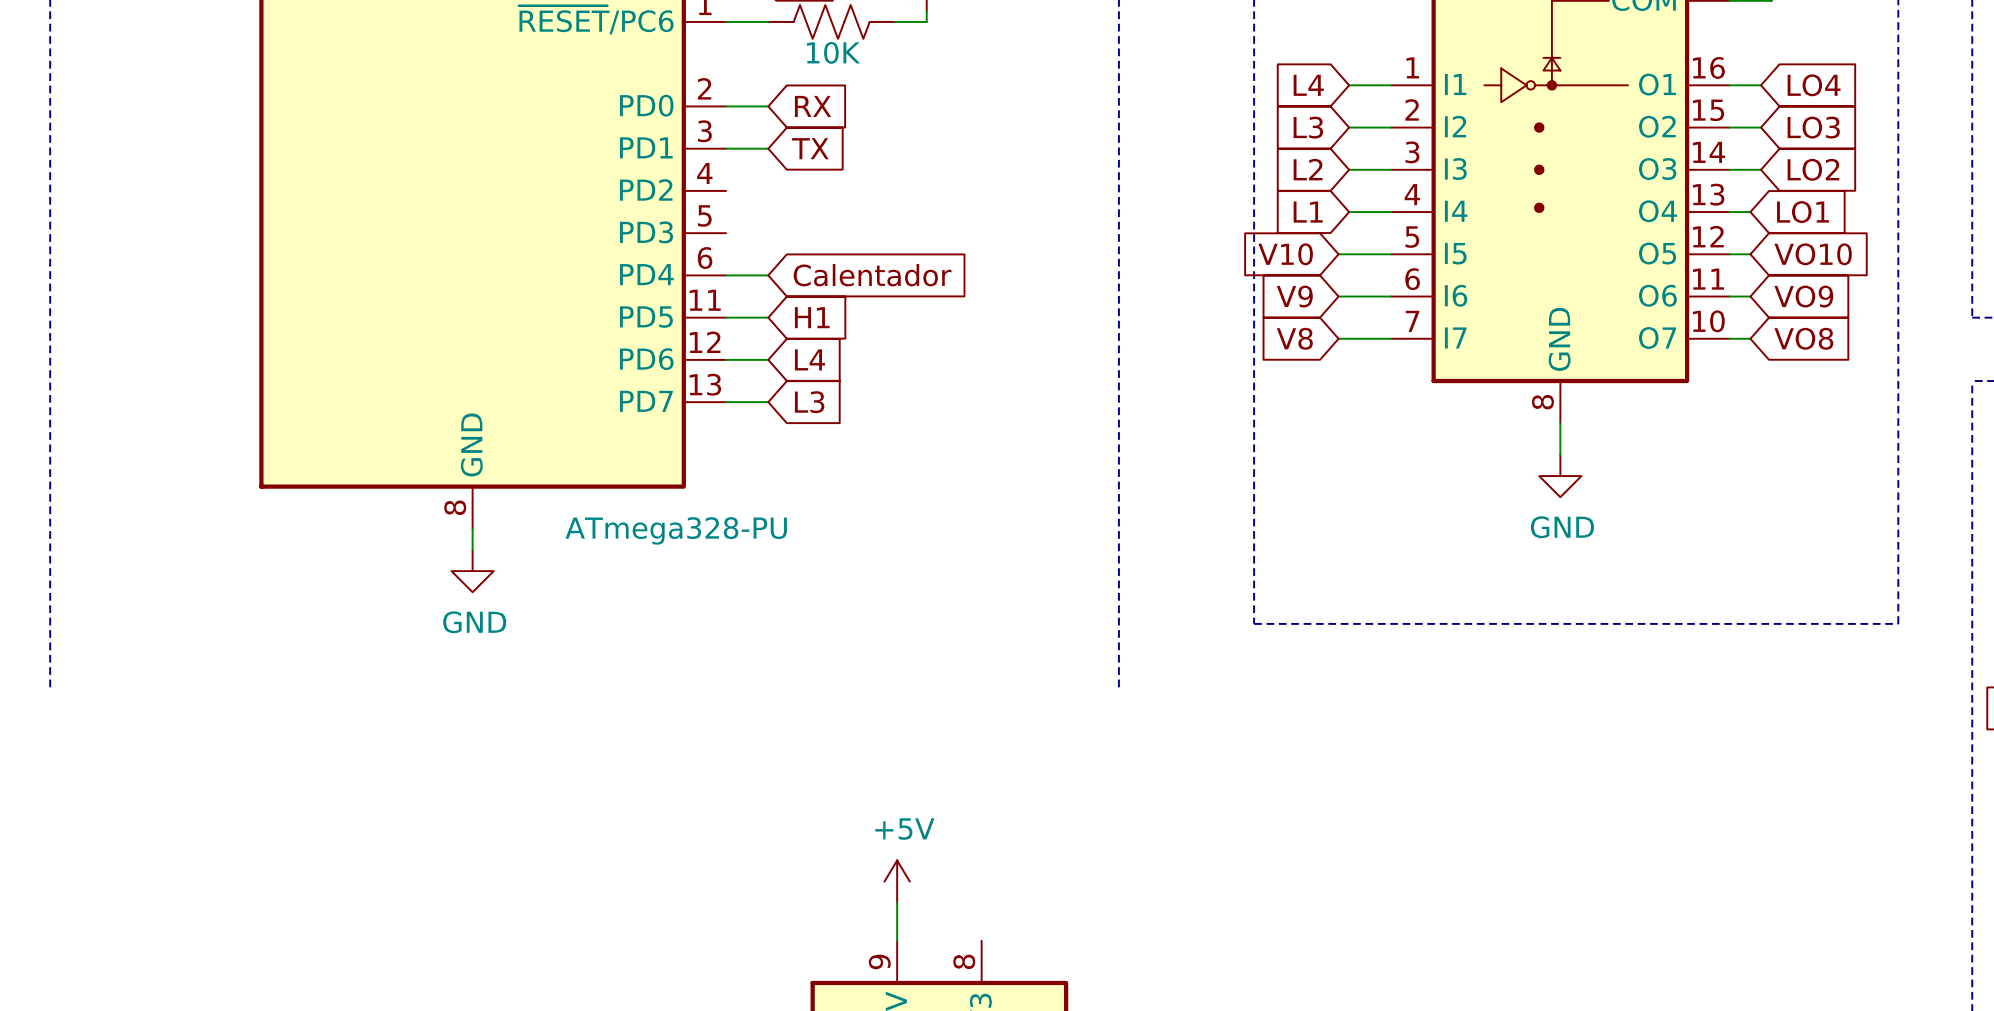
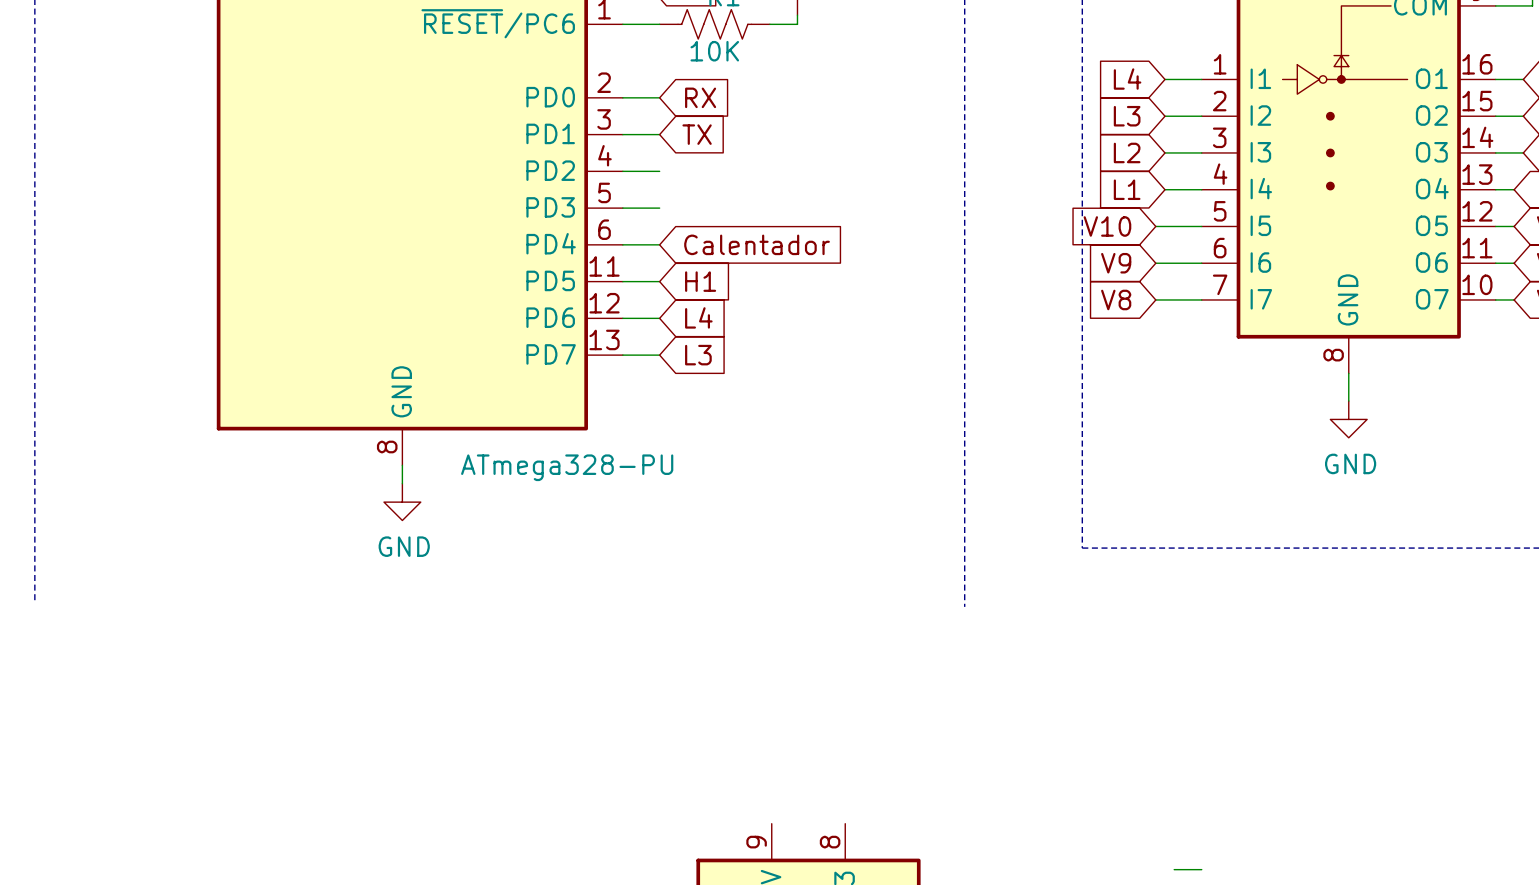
wire: none -> (622, 171) (659, 171)
wire: none -> (622, 208) (659, 208)
power symbol: +5V (897, 881) -> none
wire: (897, 902) (897, 940) -> none
wire: none -> (1174, 869) (1201, 869)

